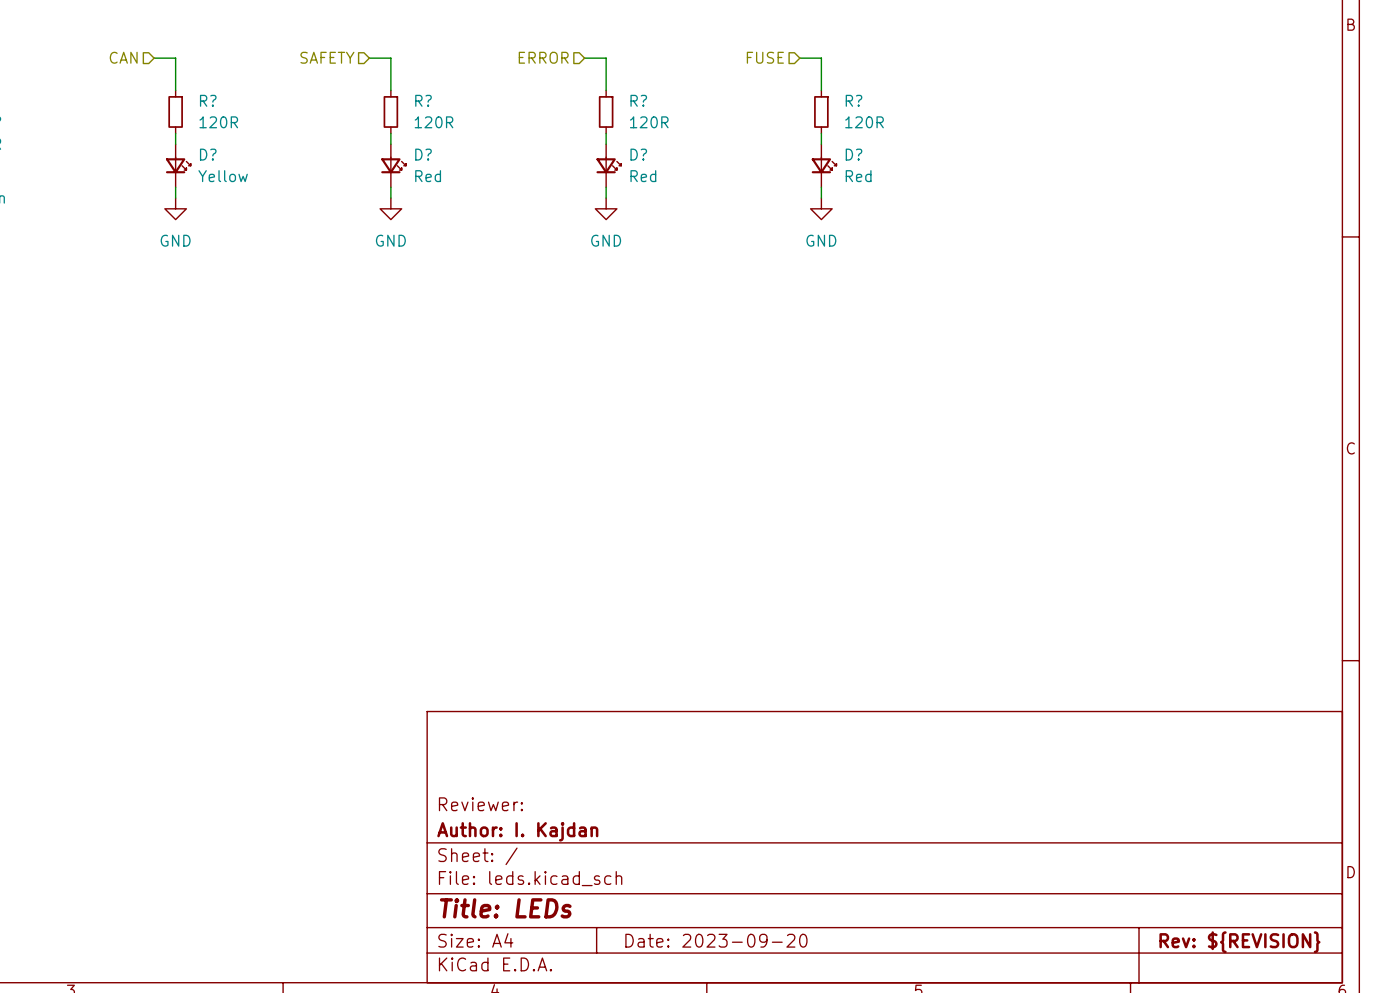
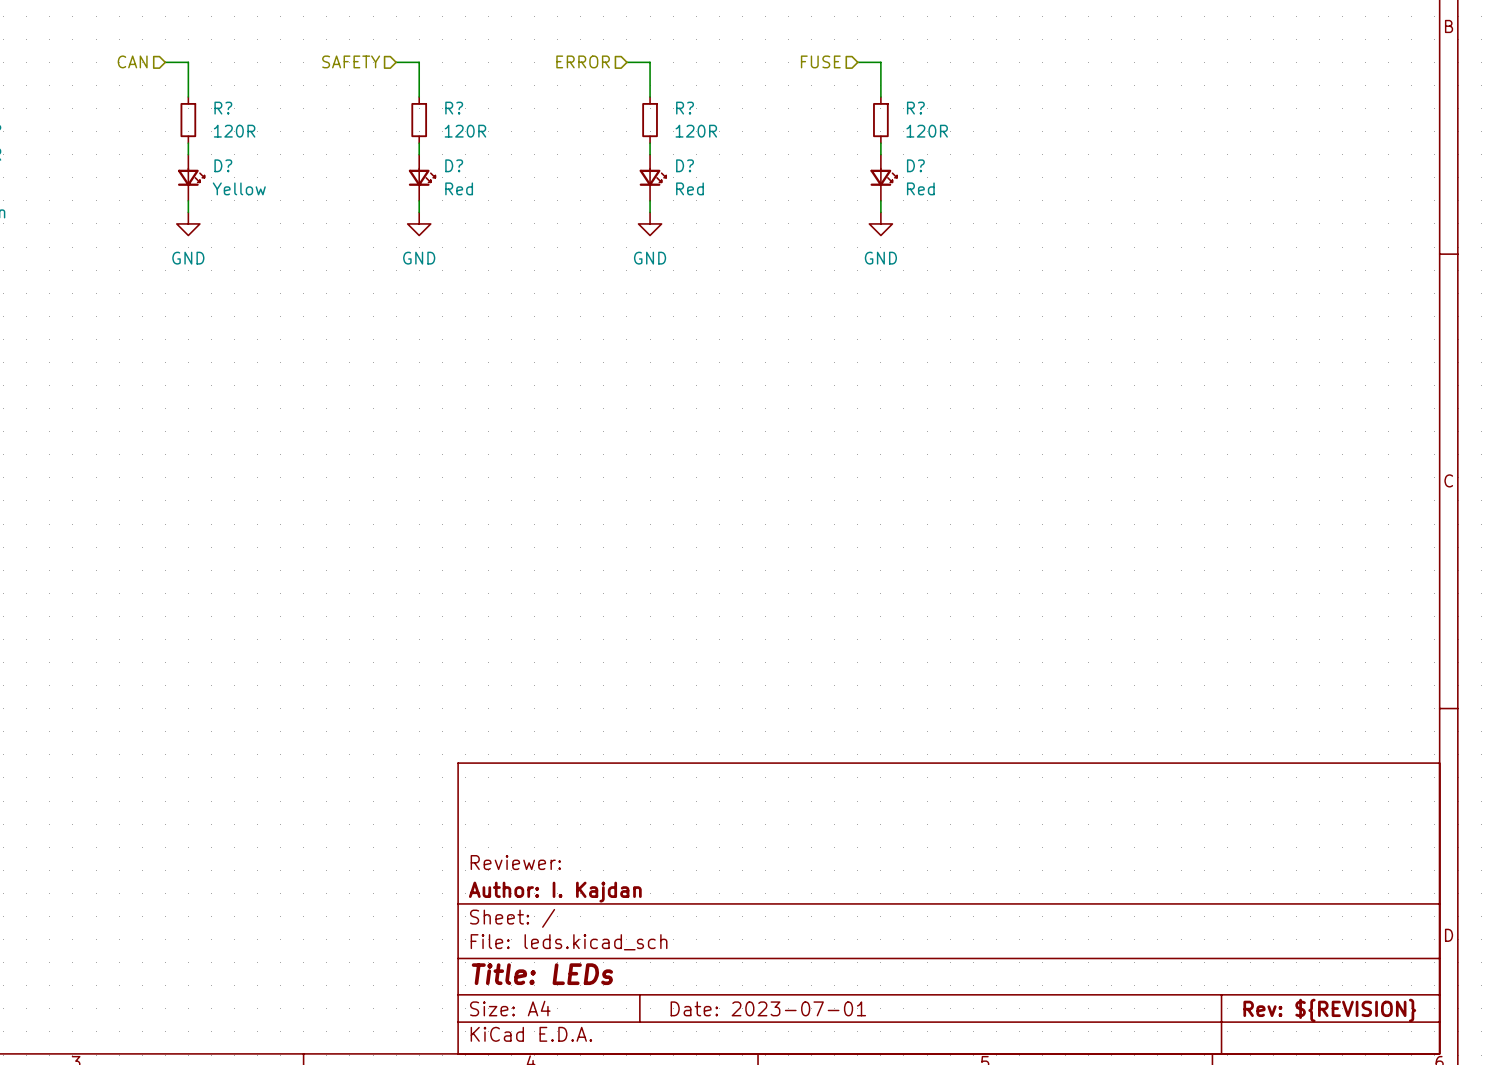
title block: Date: 2023-09-20 (716, 940) -> Date: 2023-07-01 (768, 1008)

